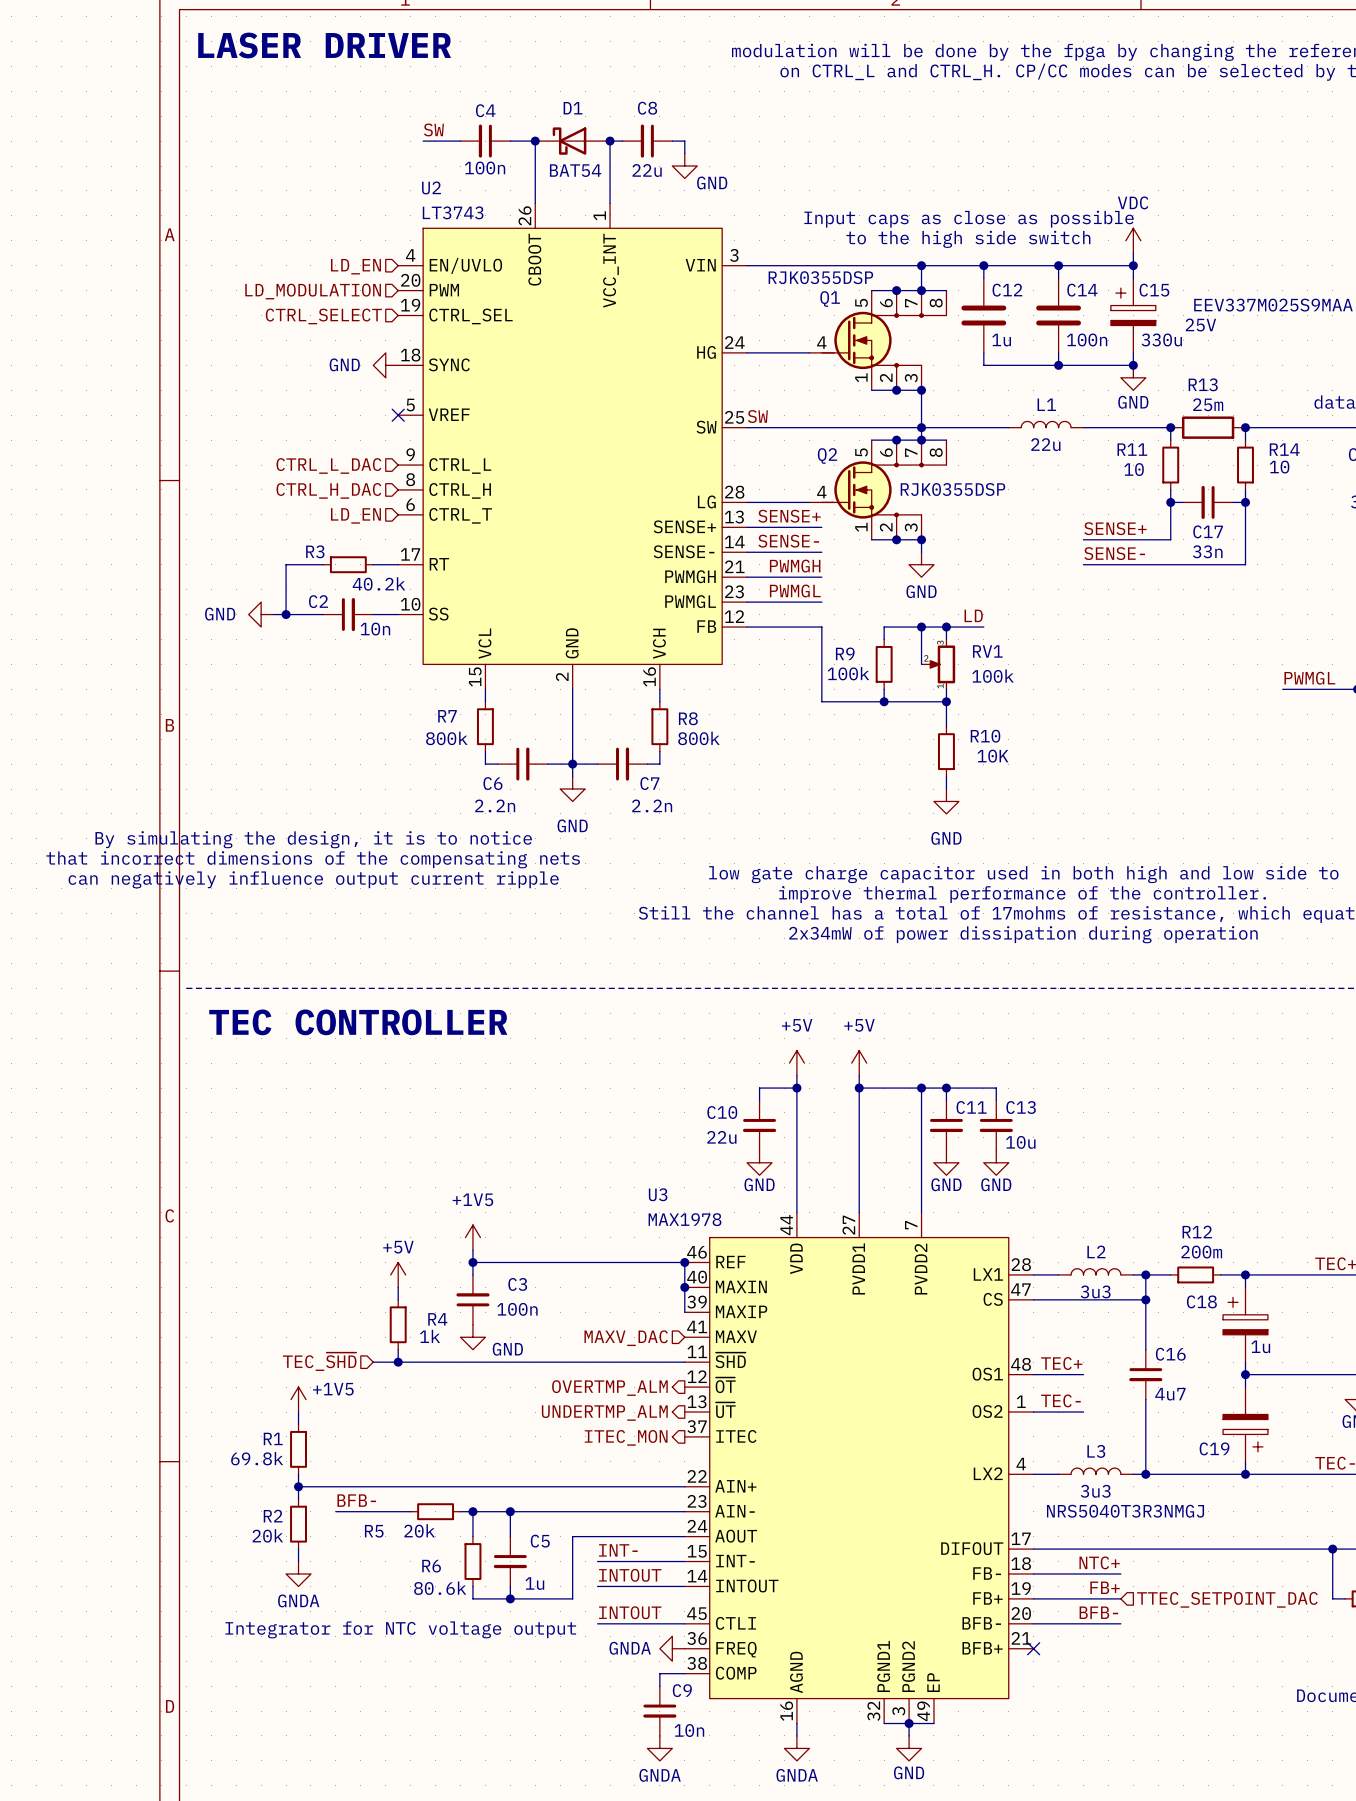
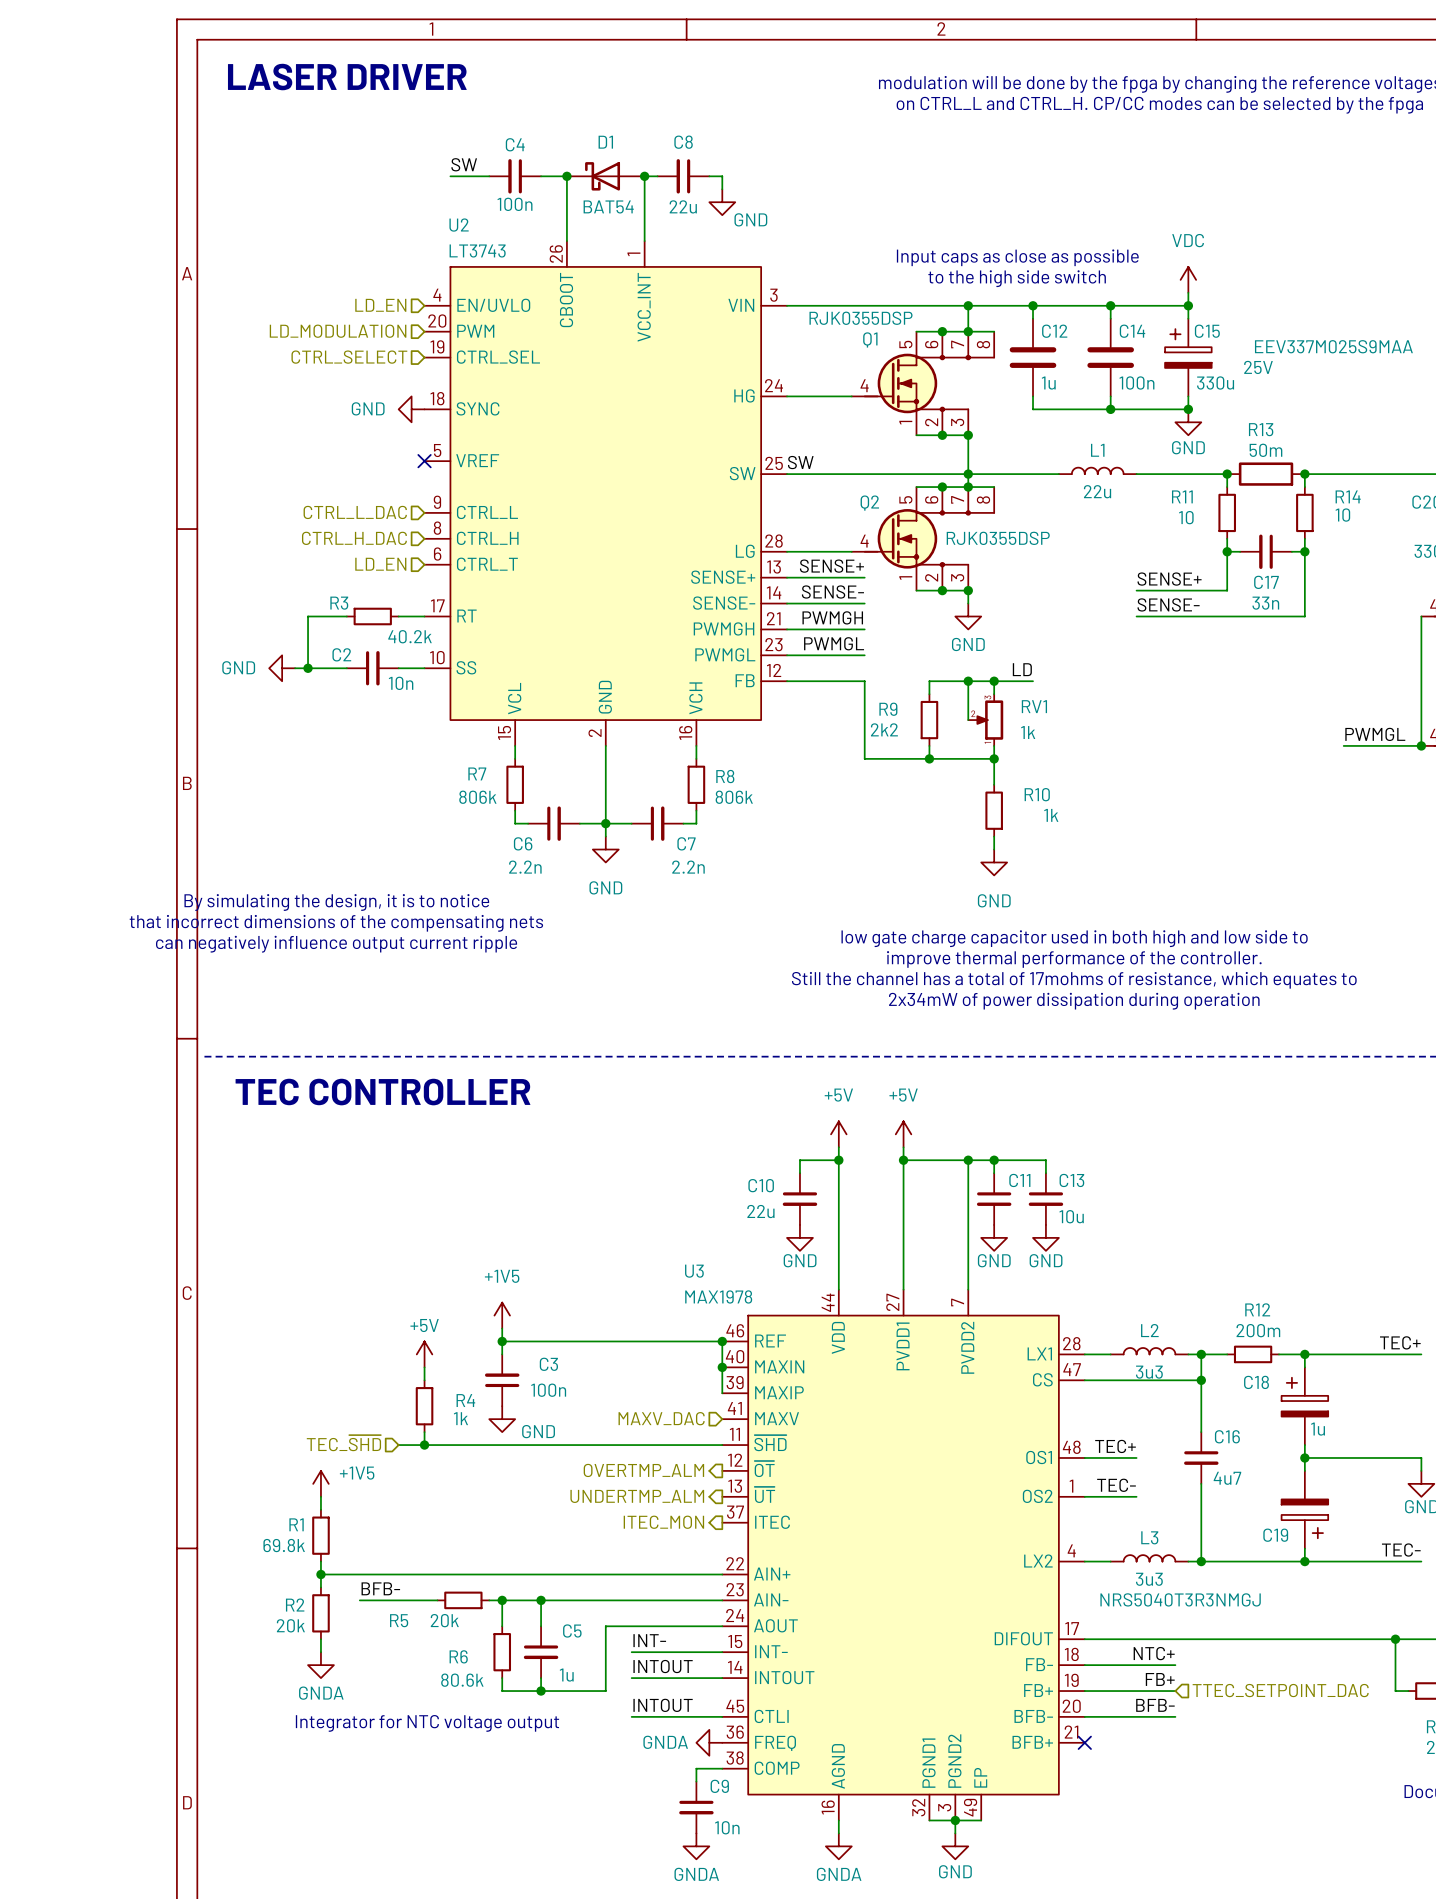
R13 value: 25m (1208, 404) -> 50m (1265, 450)
R9 value: 100k (848, 673) -> 2k2 (884, 729)
RV1 value: 100k (993, 676) -> 1k (1028, 732)
R7 value: 800k (446, 738) -> 806k (477, 797)
R8 value: 800k (698, 738) -> 806k (734, 797)
R10 value: 10K (992, 756) -> 1k (1051, 815)

